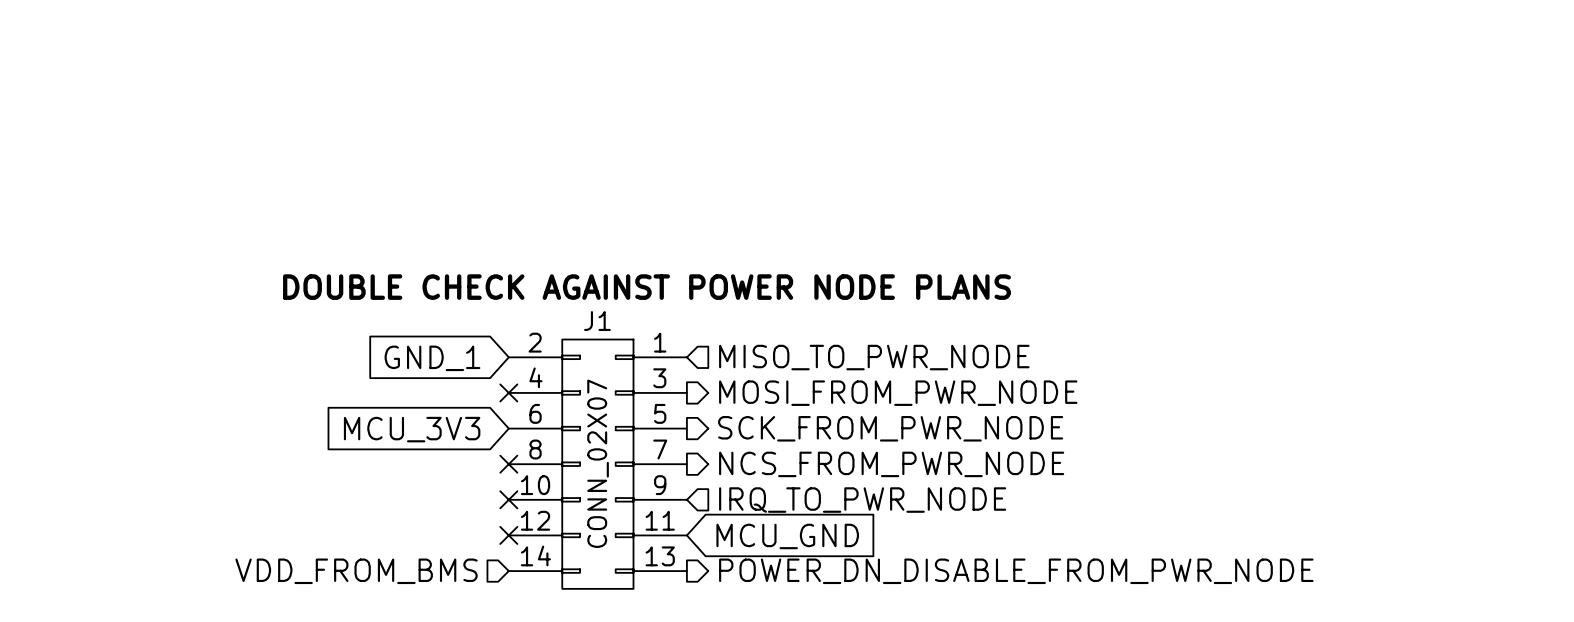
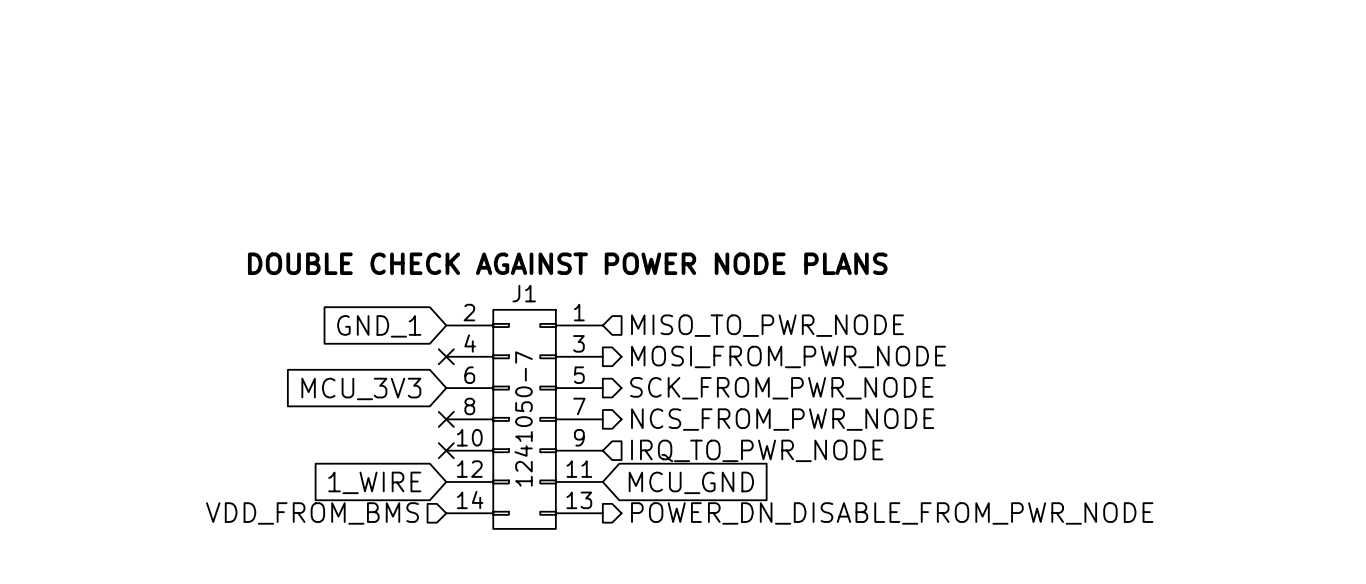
J1 value: CONN_02X07 (598, 463) -> 1241050-7 (523, 419)
no-connect mark: (508, 535) -> none
global label: none -> 1_WIRE (374, 482)

